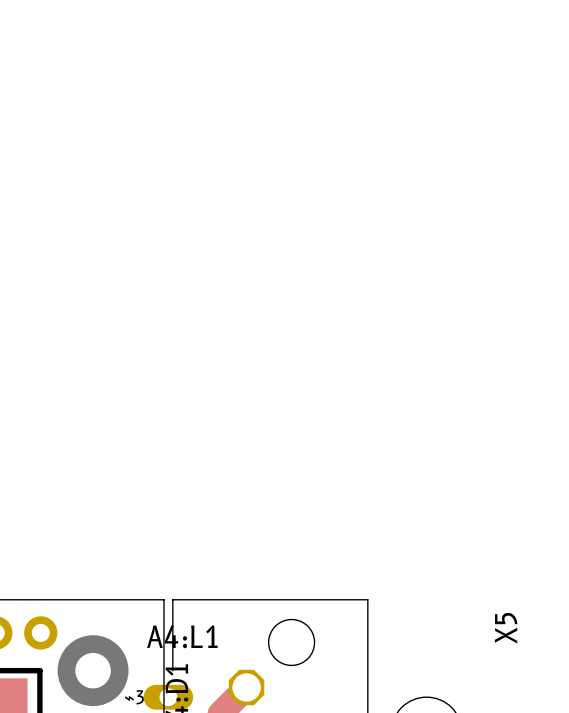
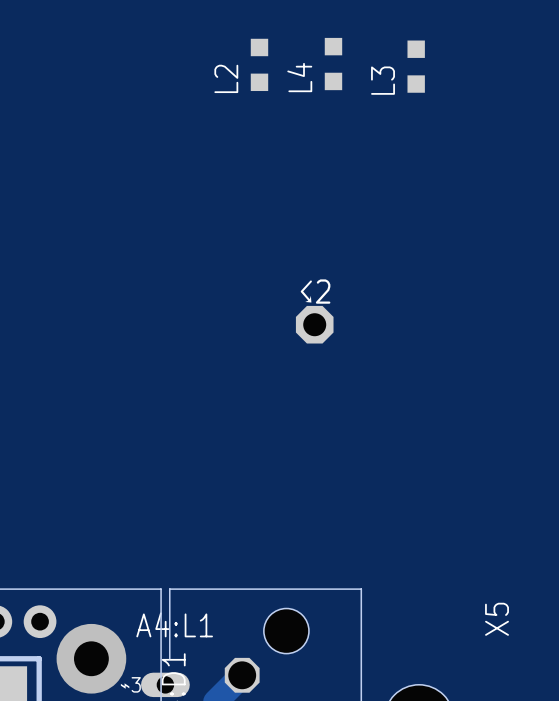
L4: none -> (333, 64)
L2: none -> (259, 64)
L3: none -> (416, 66)
☇2: none -> (314, 324)

